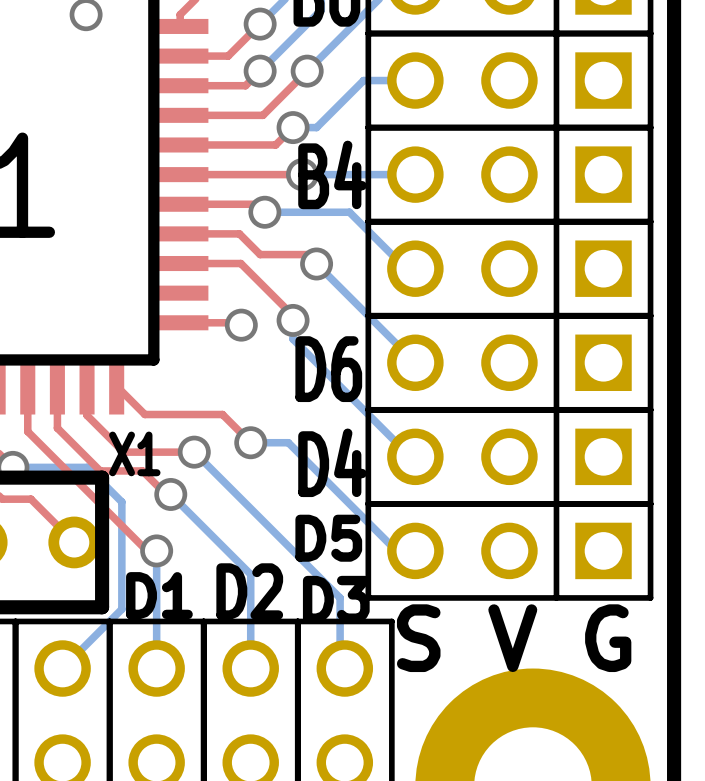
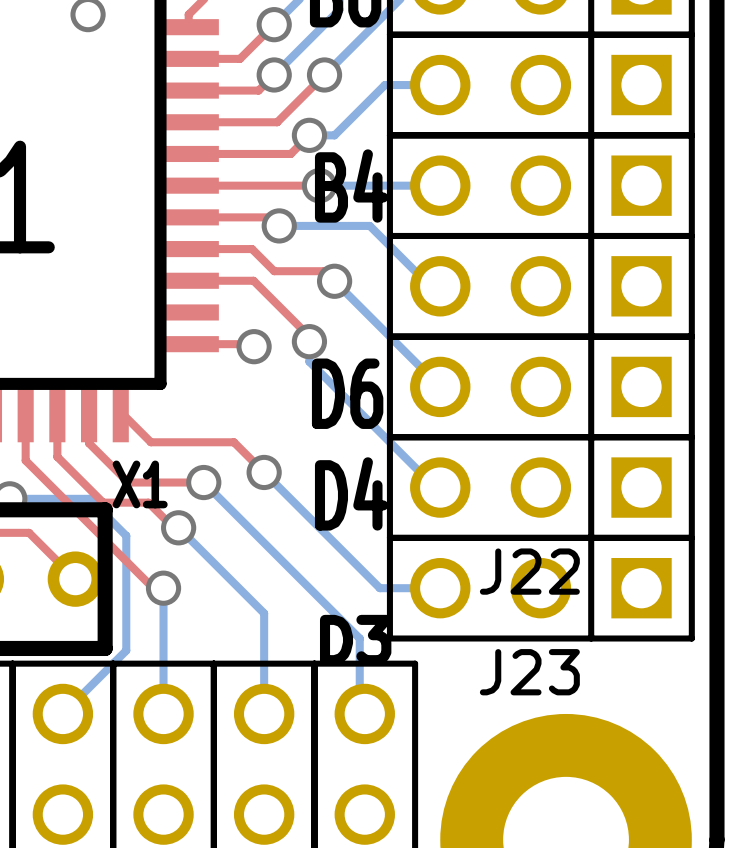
bottom track: (250, 442) (288, 442) (396, 550) -> (264, 472) (379, 588) (420, 588)
J22 name: none -> J22 (529, 571)
text: D5 (328, 538) -> none
text: D2 (249, 591) -> none
text: D1 (159, 595) -> none
J23 name: none -> J23 (529, 672)
text: S V G (514, 638) -> none

